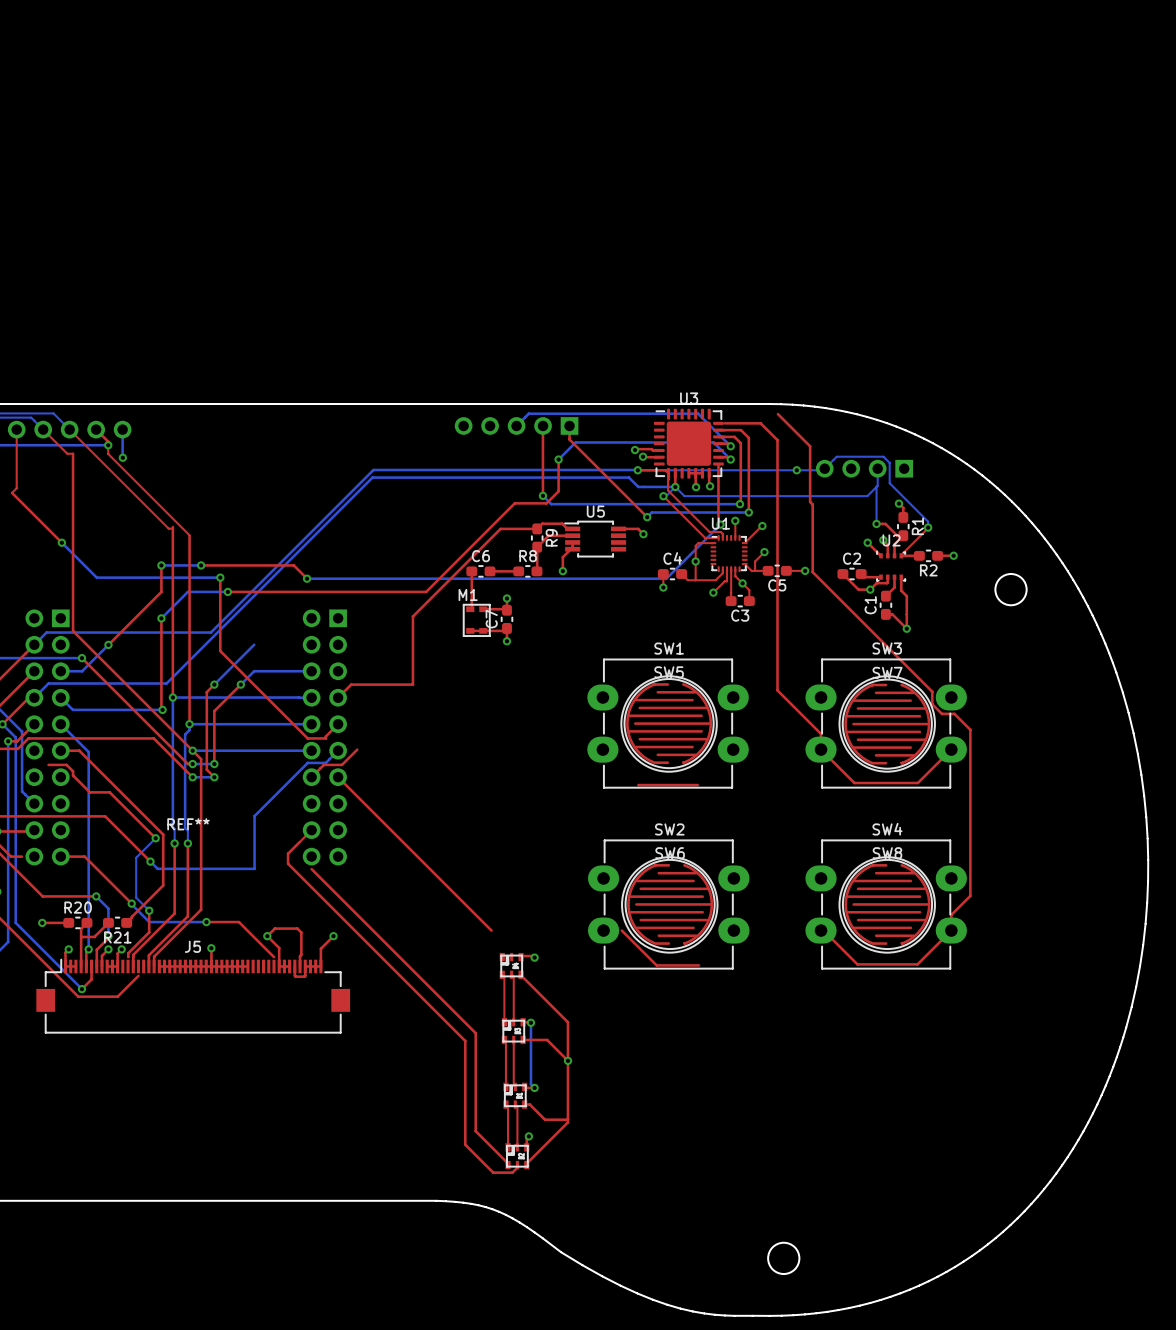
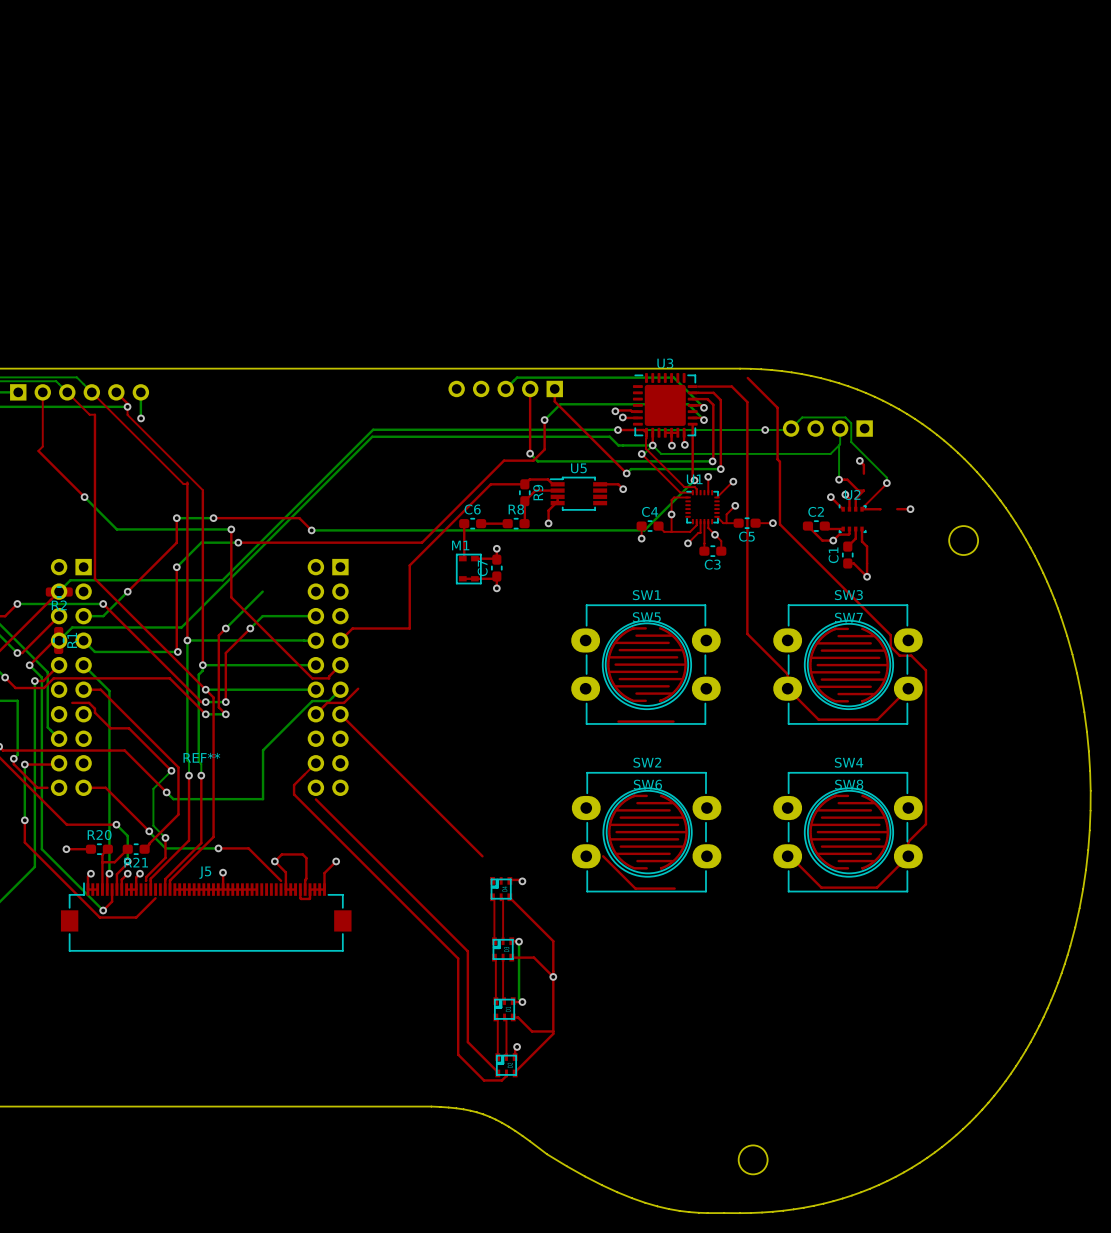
R1 position: (903, 526) -> (58, 640)
R2 position: (928, 555) -> (59, 592)

